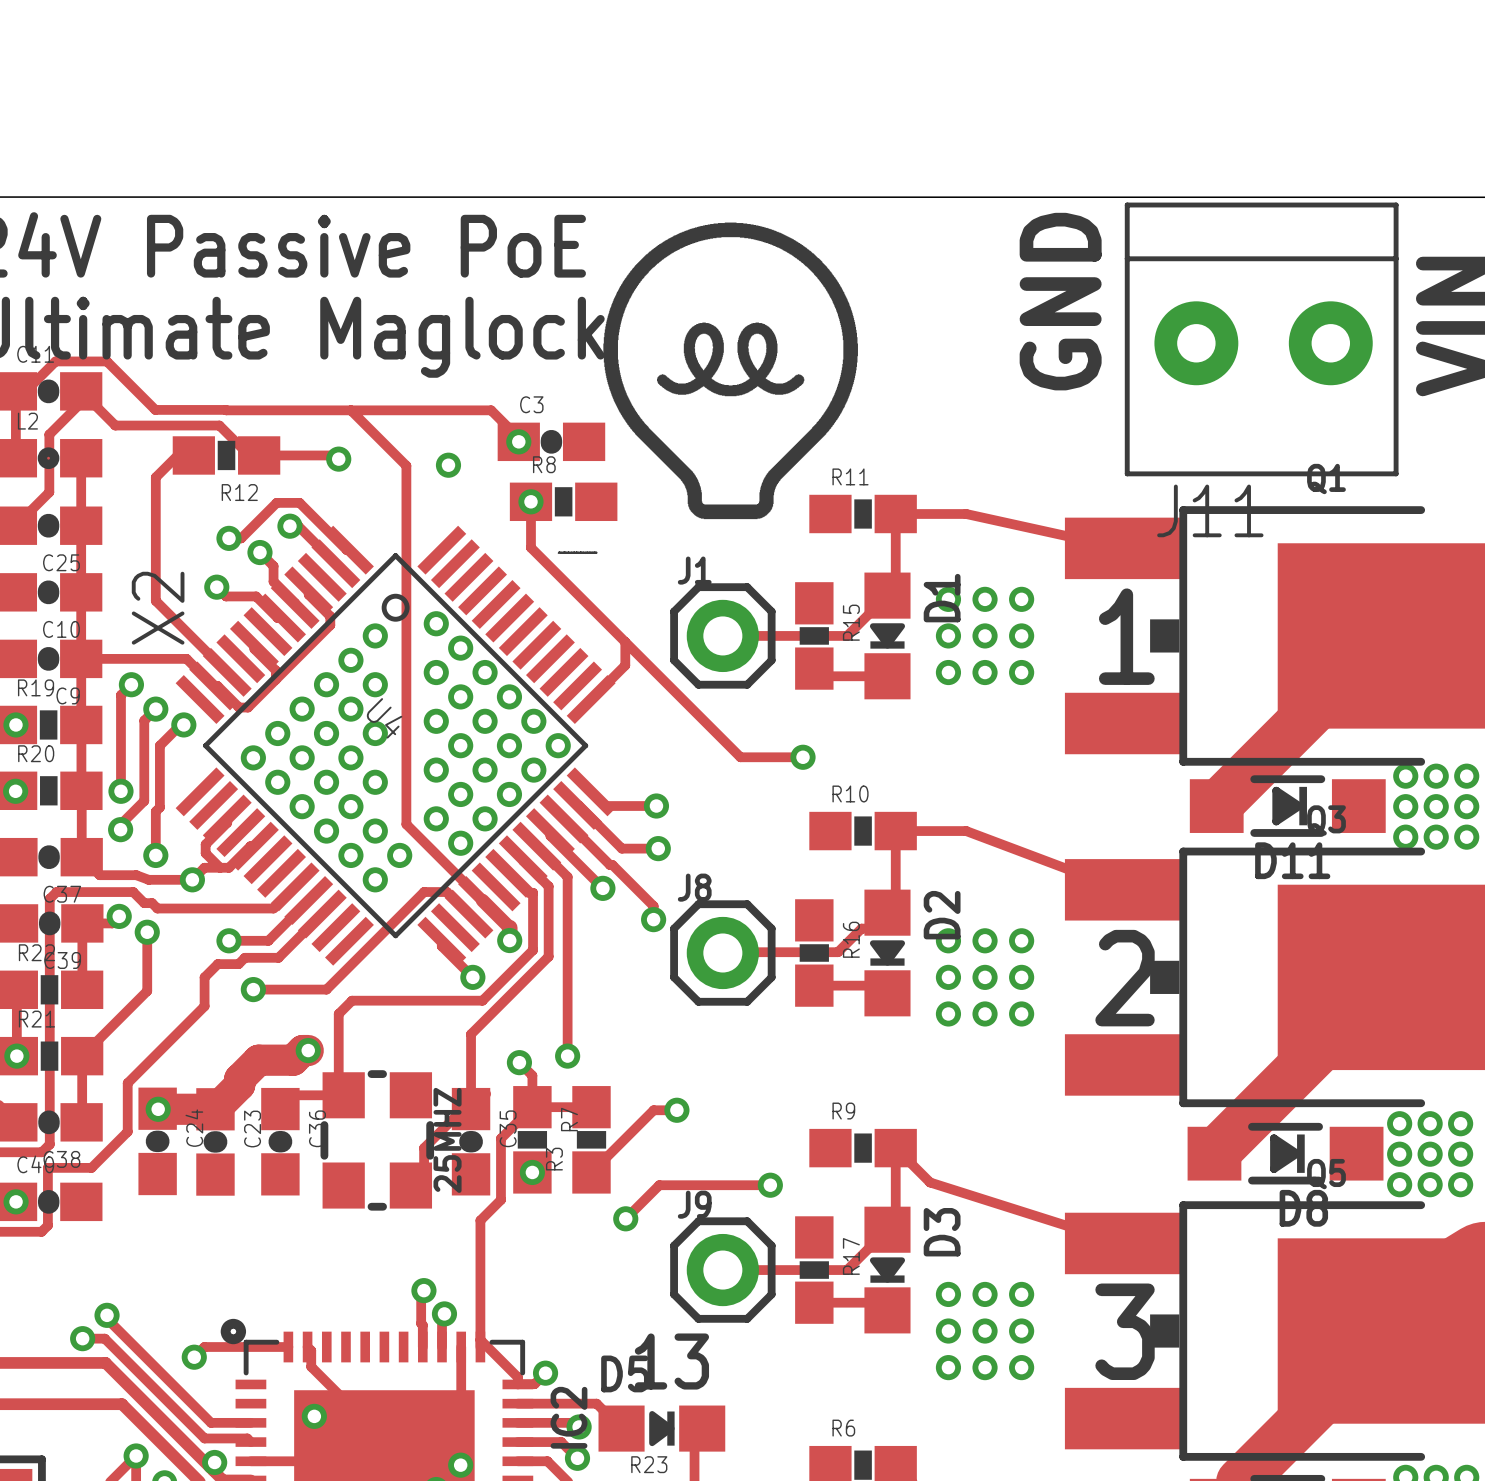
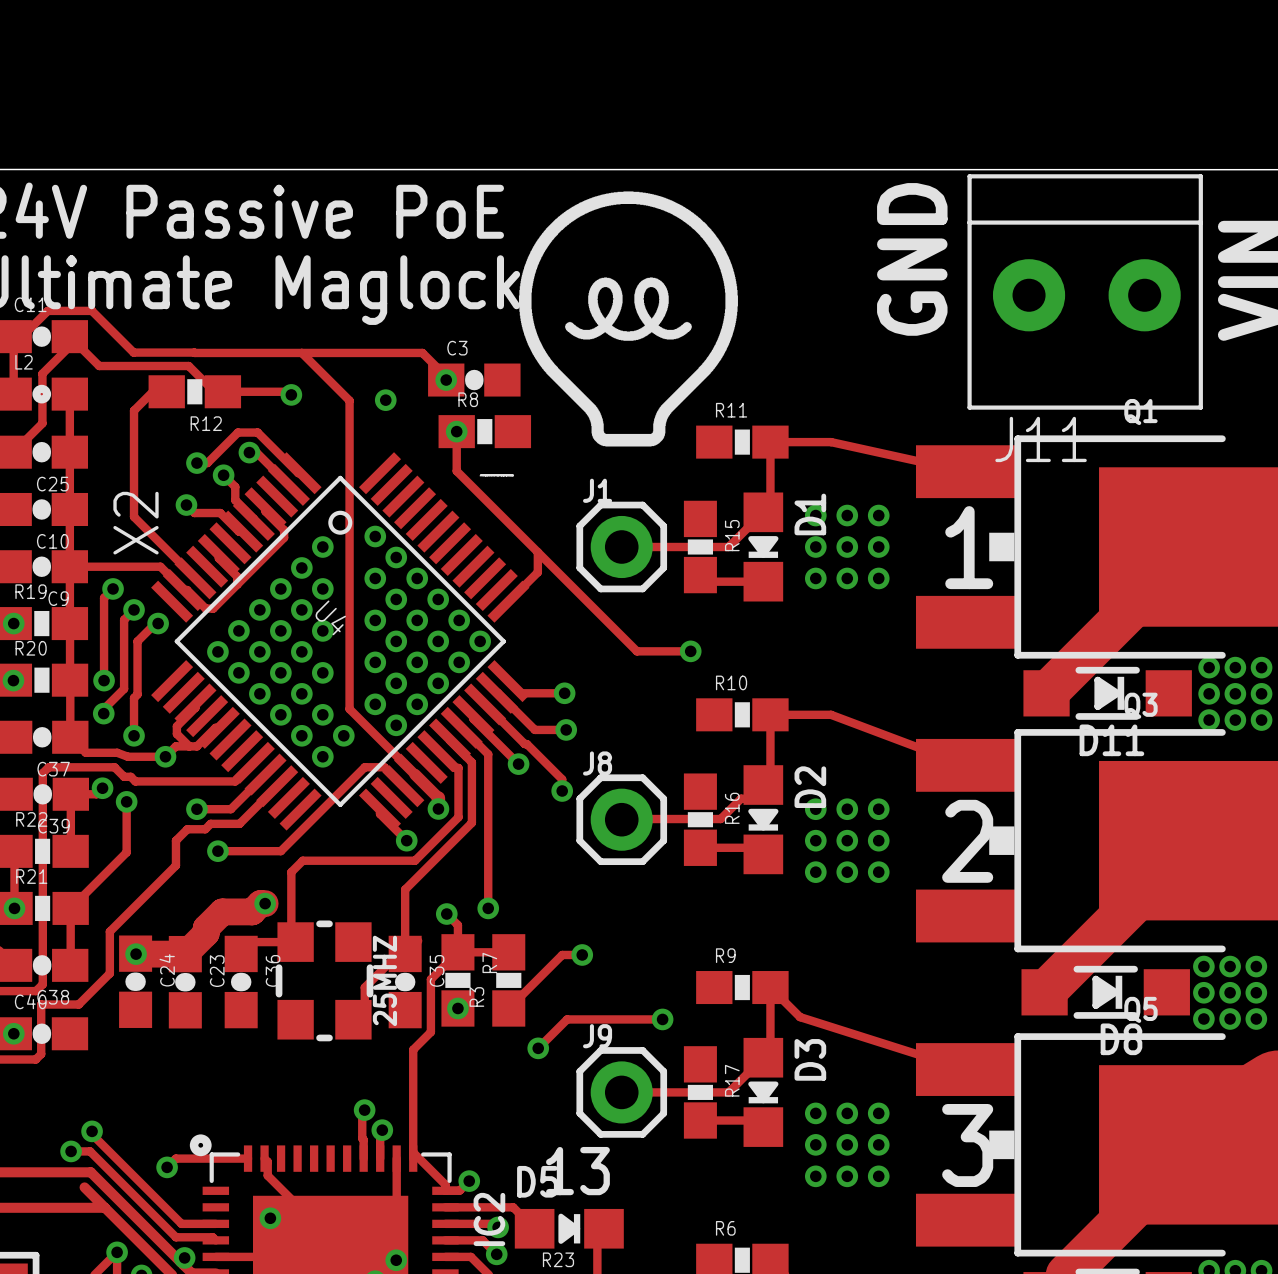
track: none -> (84, 1187) (104, 1207)

